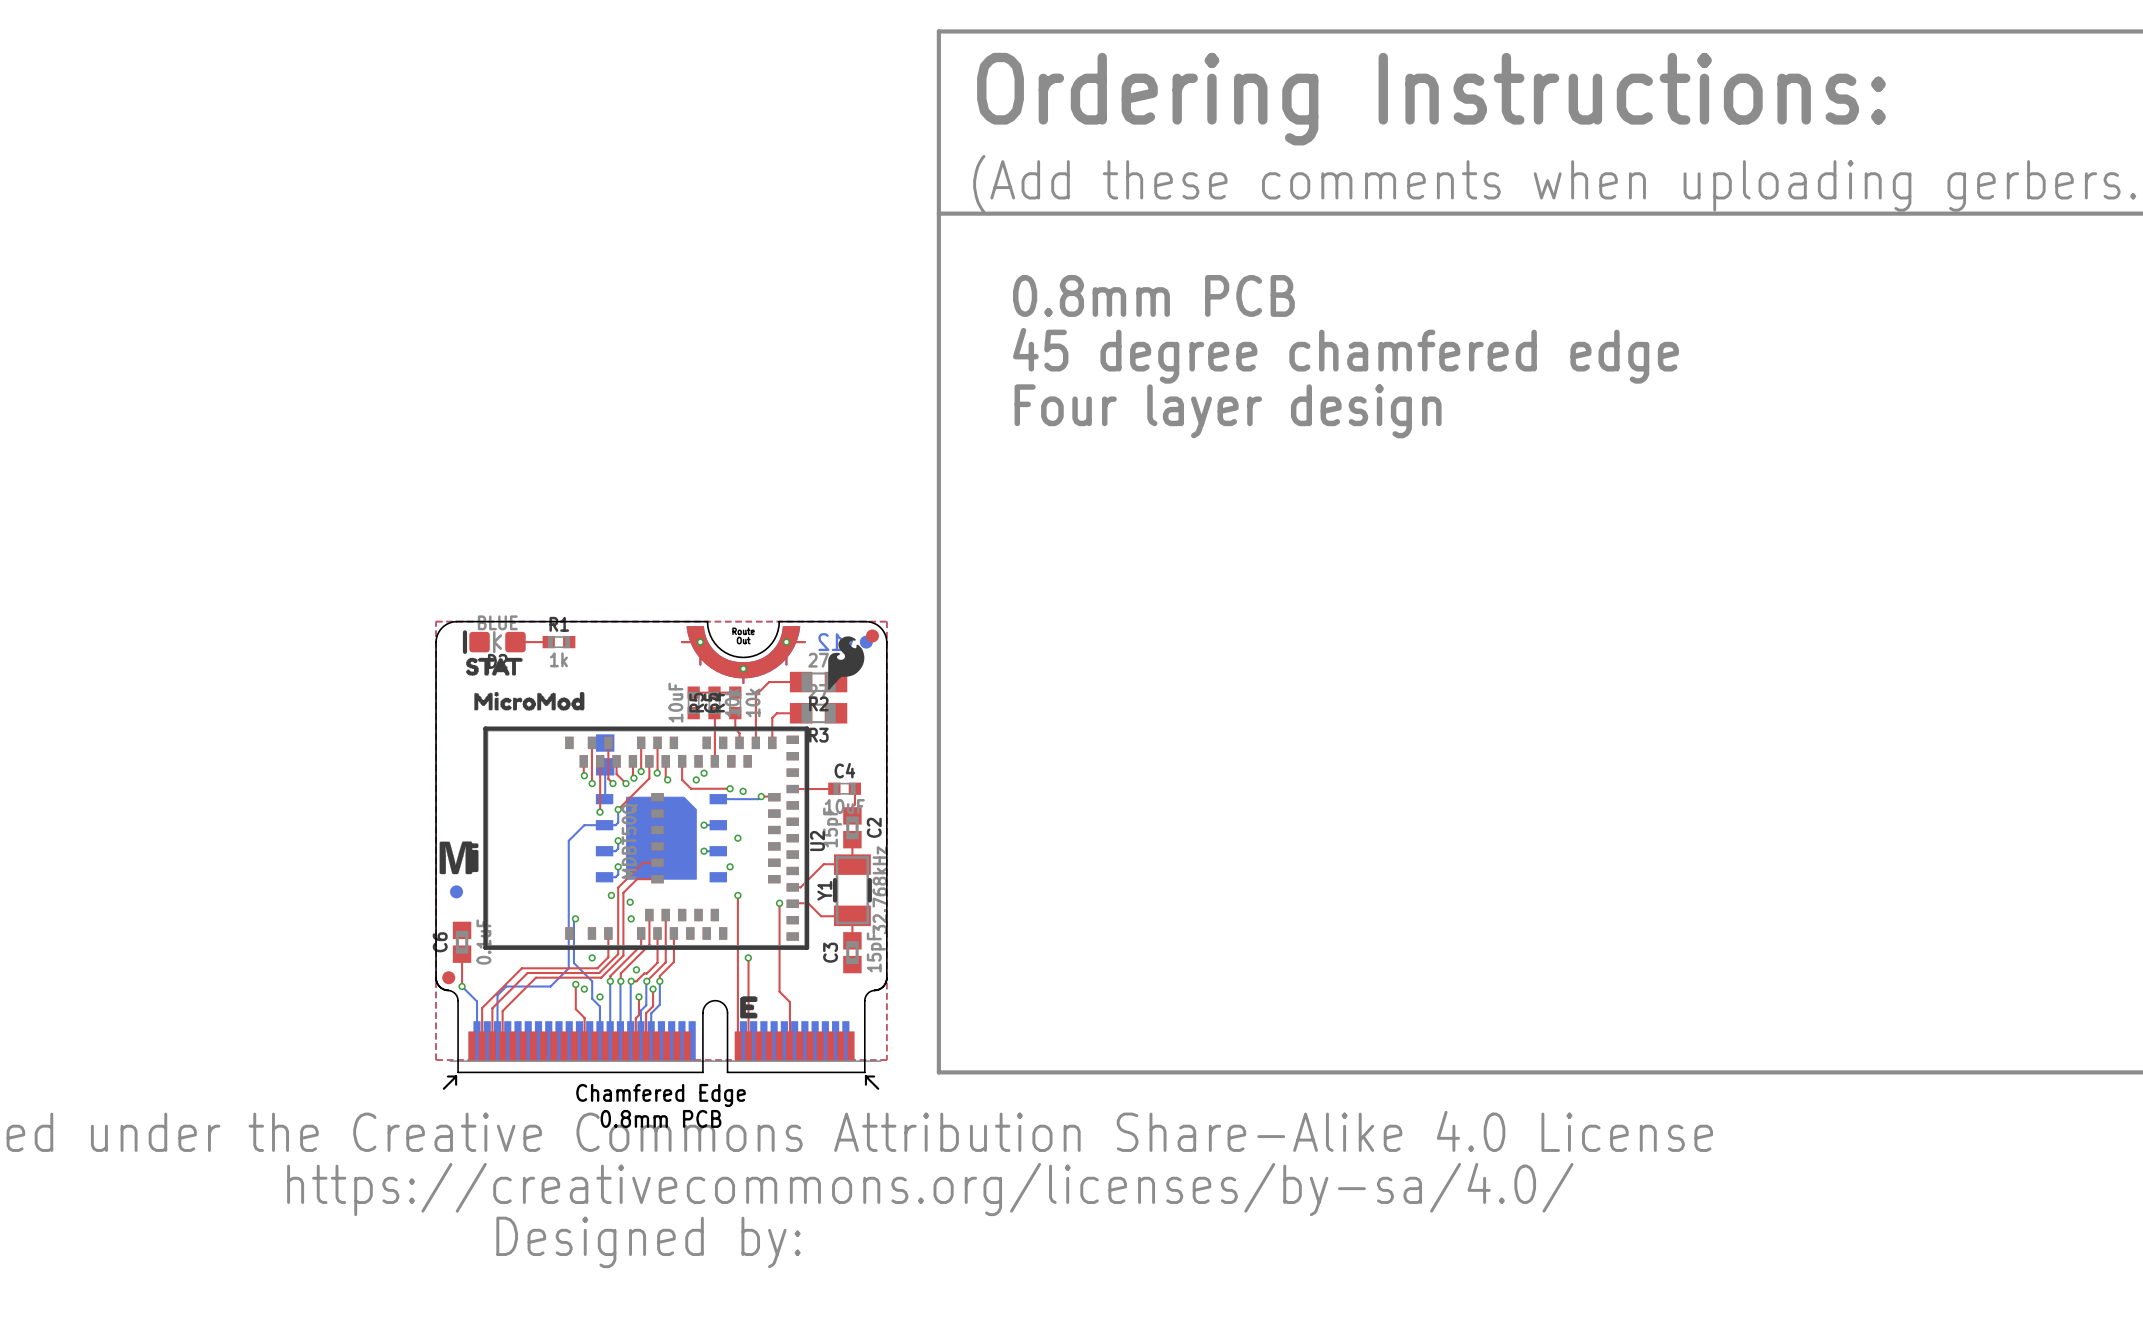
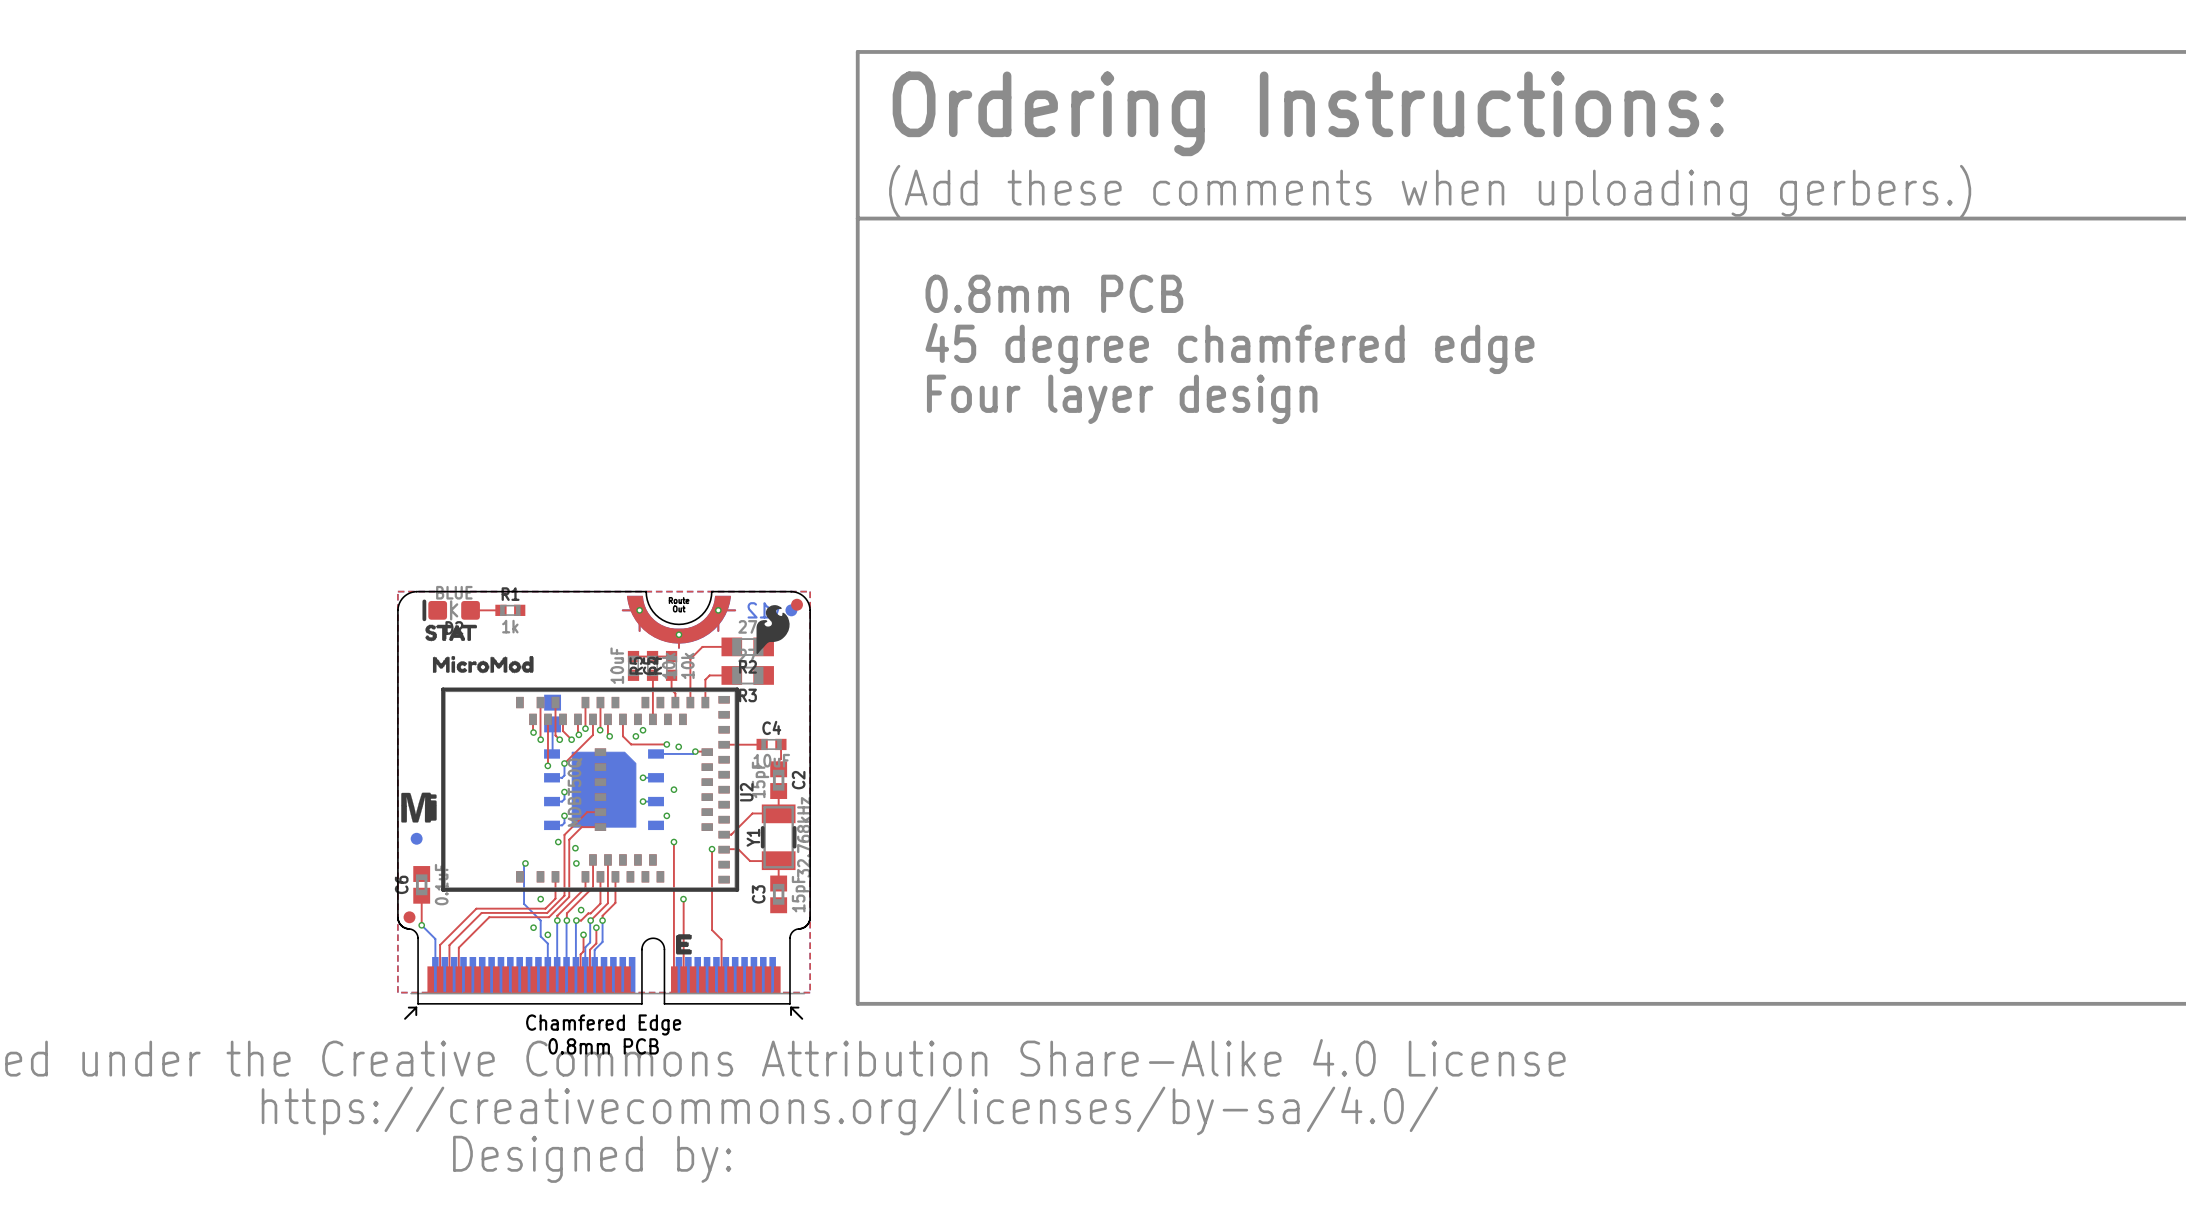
bottom track: (604, 825) (584, 825) (568, 840) (568, 968) (550, 986) (506, 986) (497, 995) (497, 1041) -> none
top track: (575, 984) (575, 1009) (584, 1017) (584, 1046) -> none
via: (575, 984) -> none

